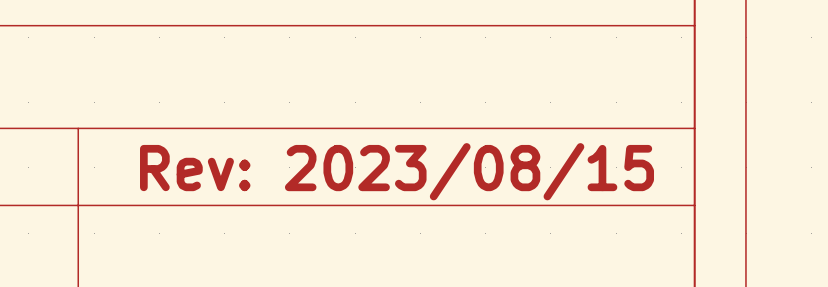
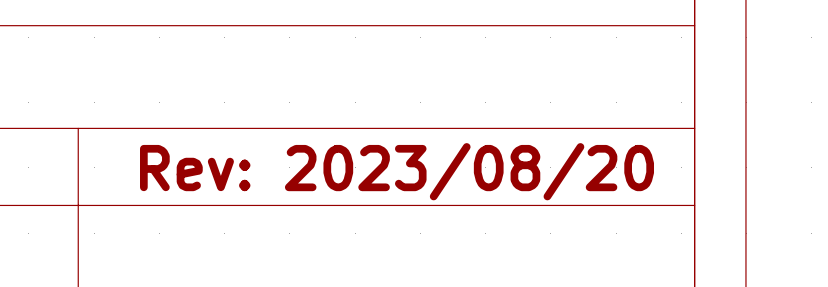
title block: Rev: 2023/08/15 (397, 171) -> Rev: 2023/08/20 (397, 171)

